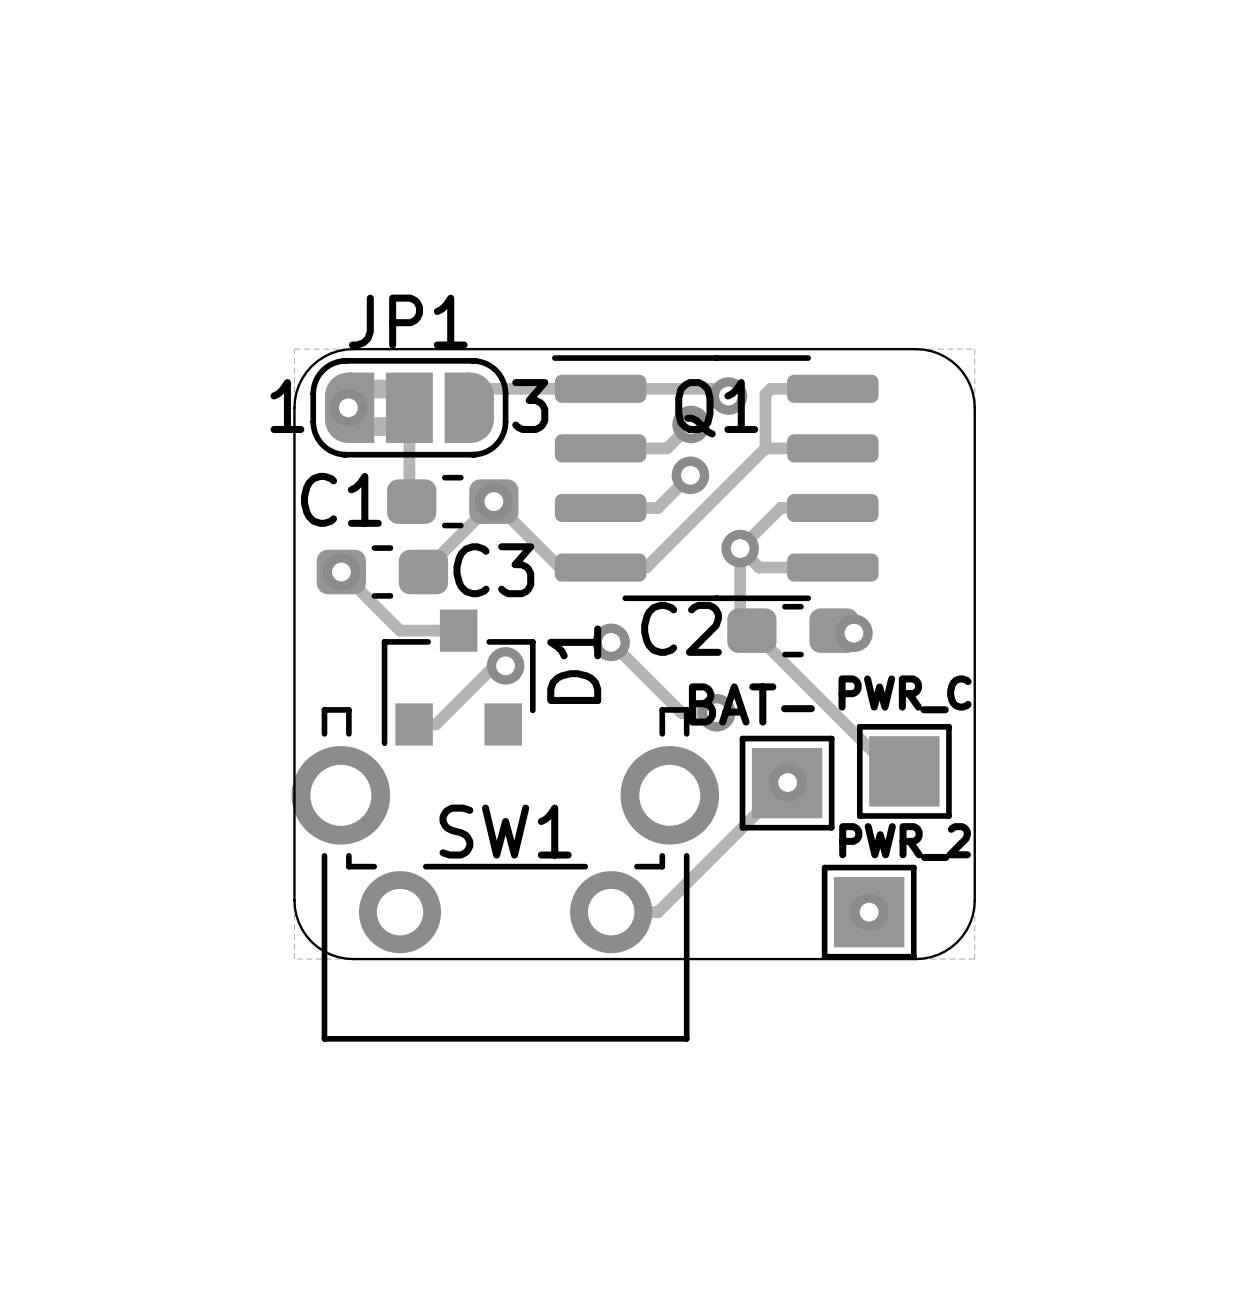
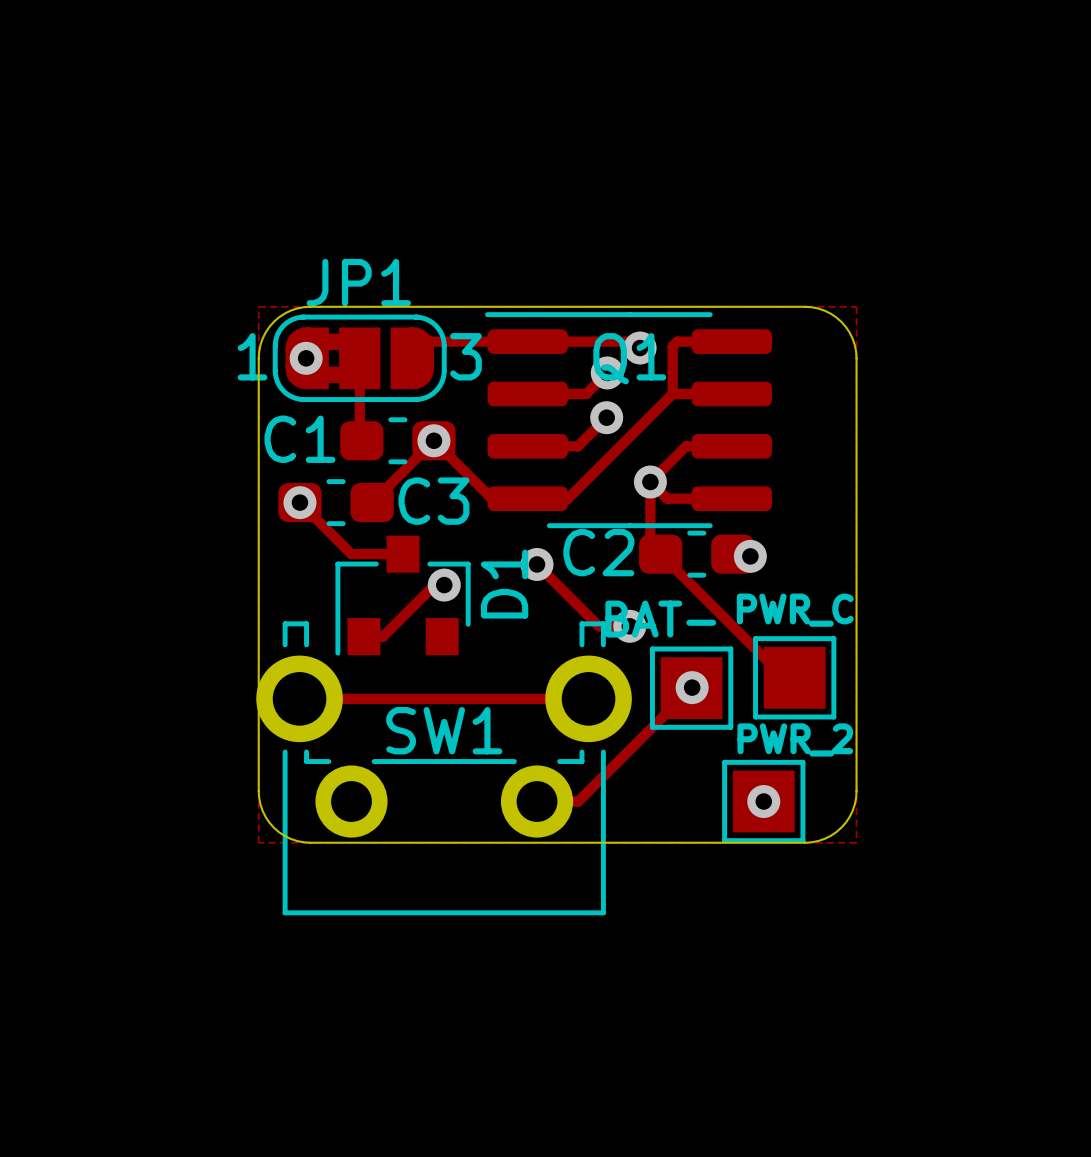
track: none -> (299, 698) (588, 698)

